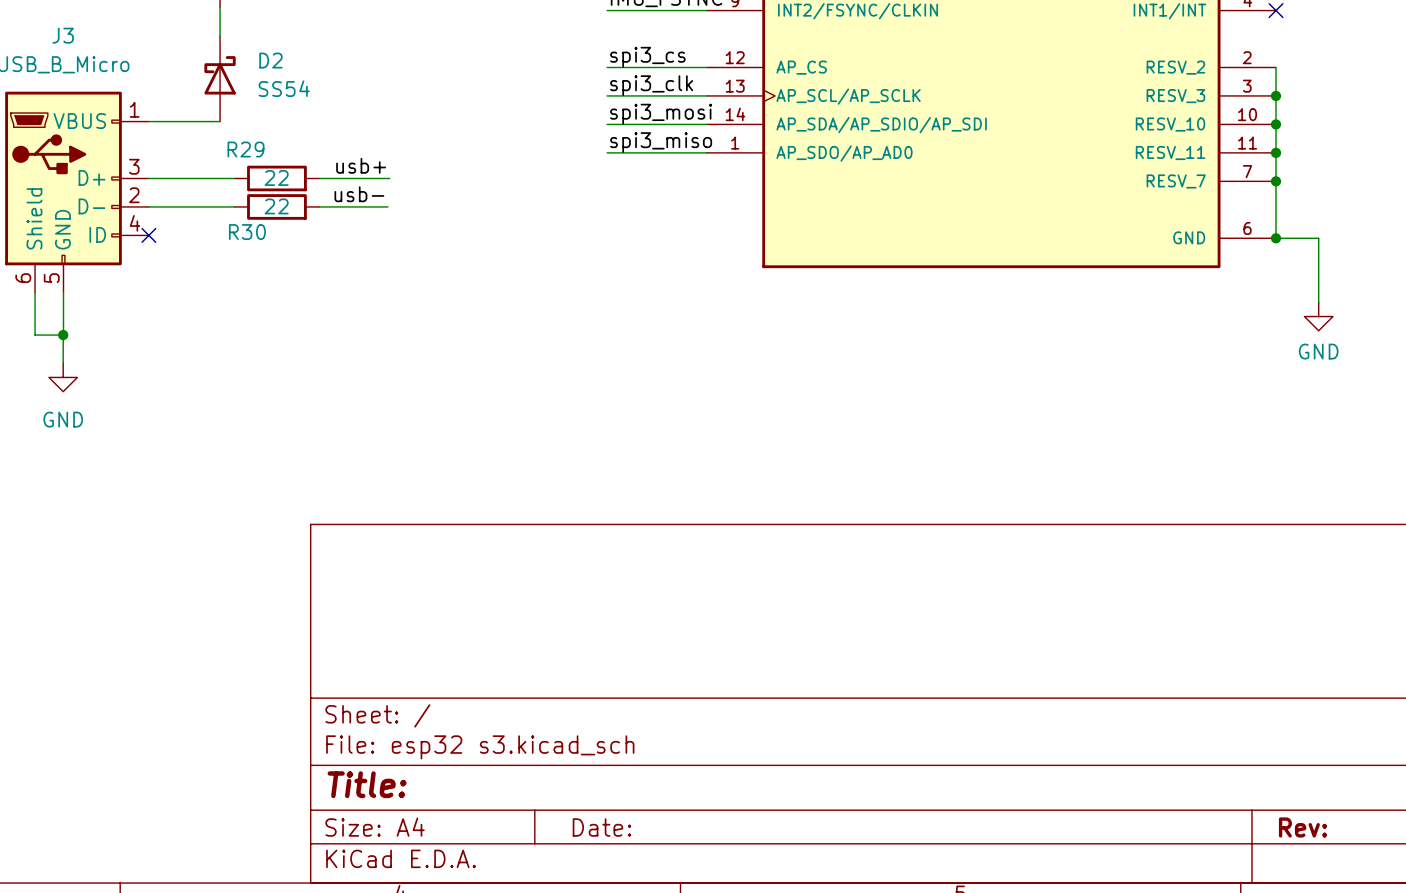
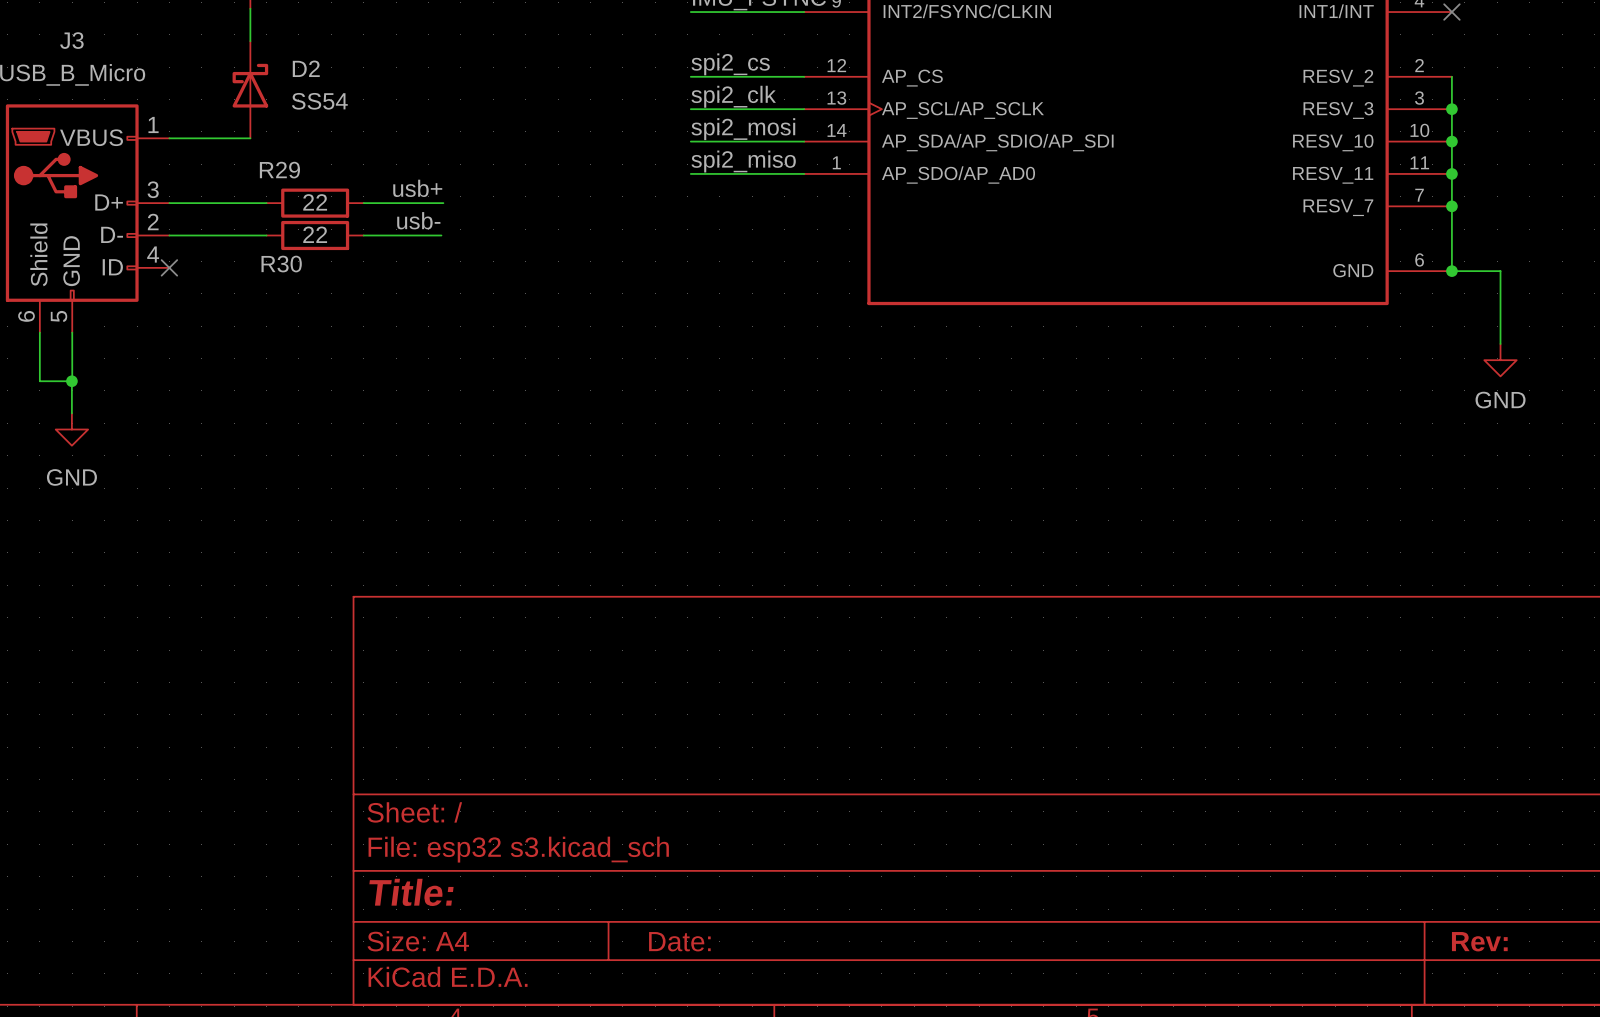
label: spi3_cs (647, 57) -> spi2_cs (730, 64)
label: spi3_clk (651, 85) -> spi2_clk (733, 96)
label: spi3_mosi (661, 114) -> spi2_mosi (743, 129)
label: spi3_miso (661, 142) -> spi2_miso (743, 161)

